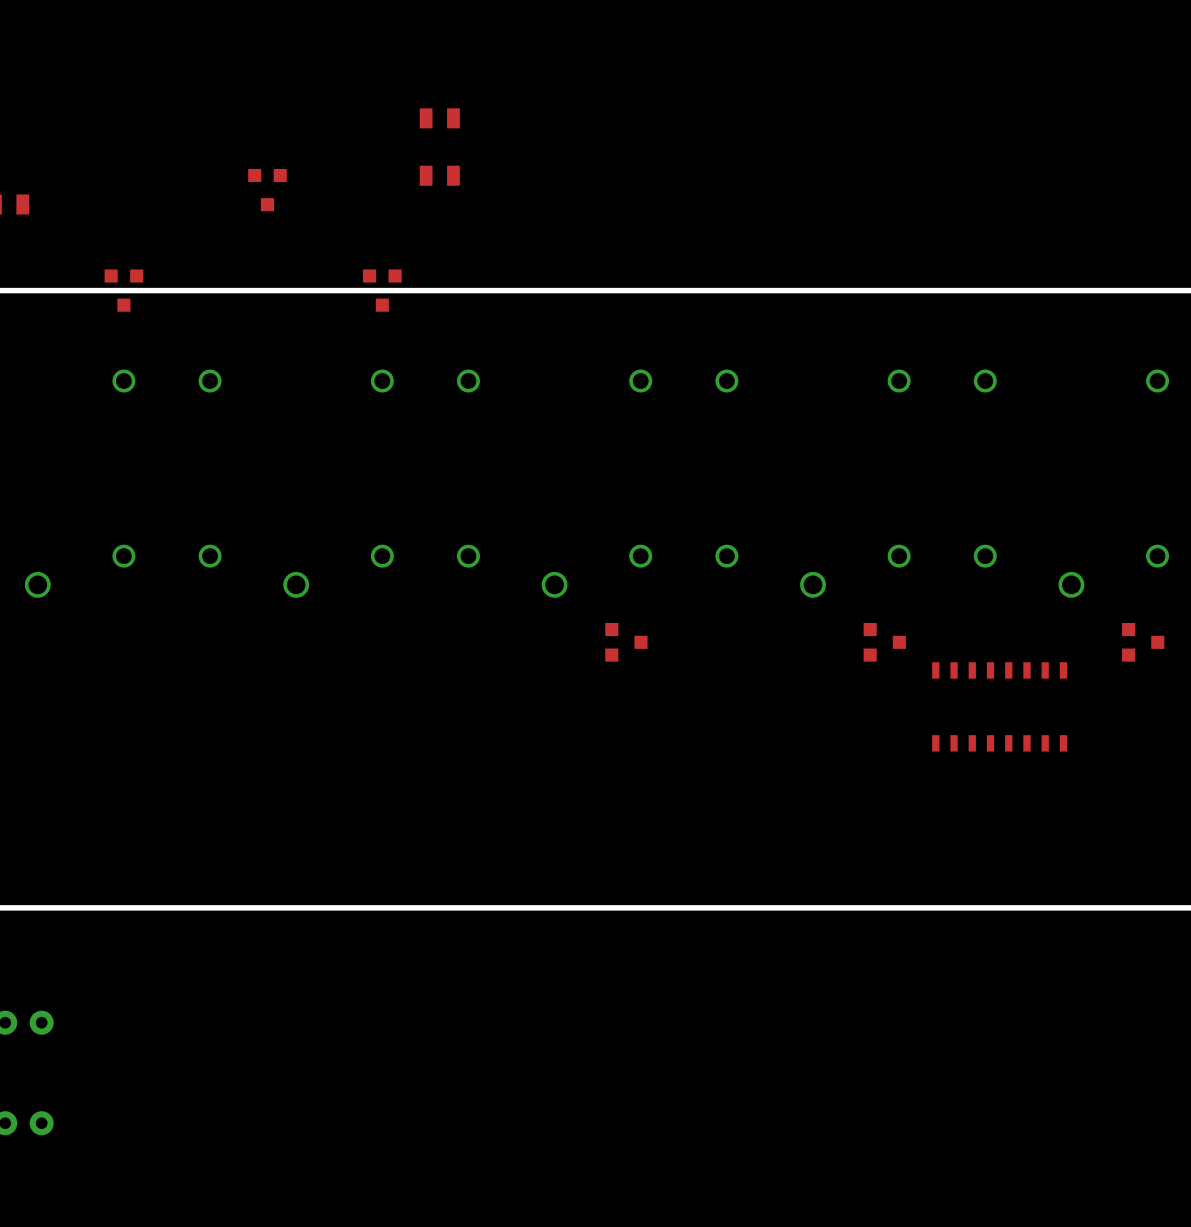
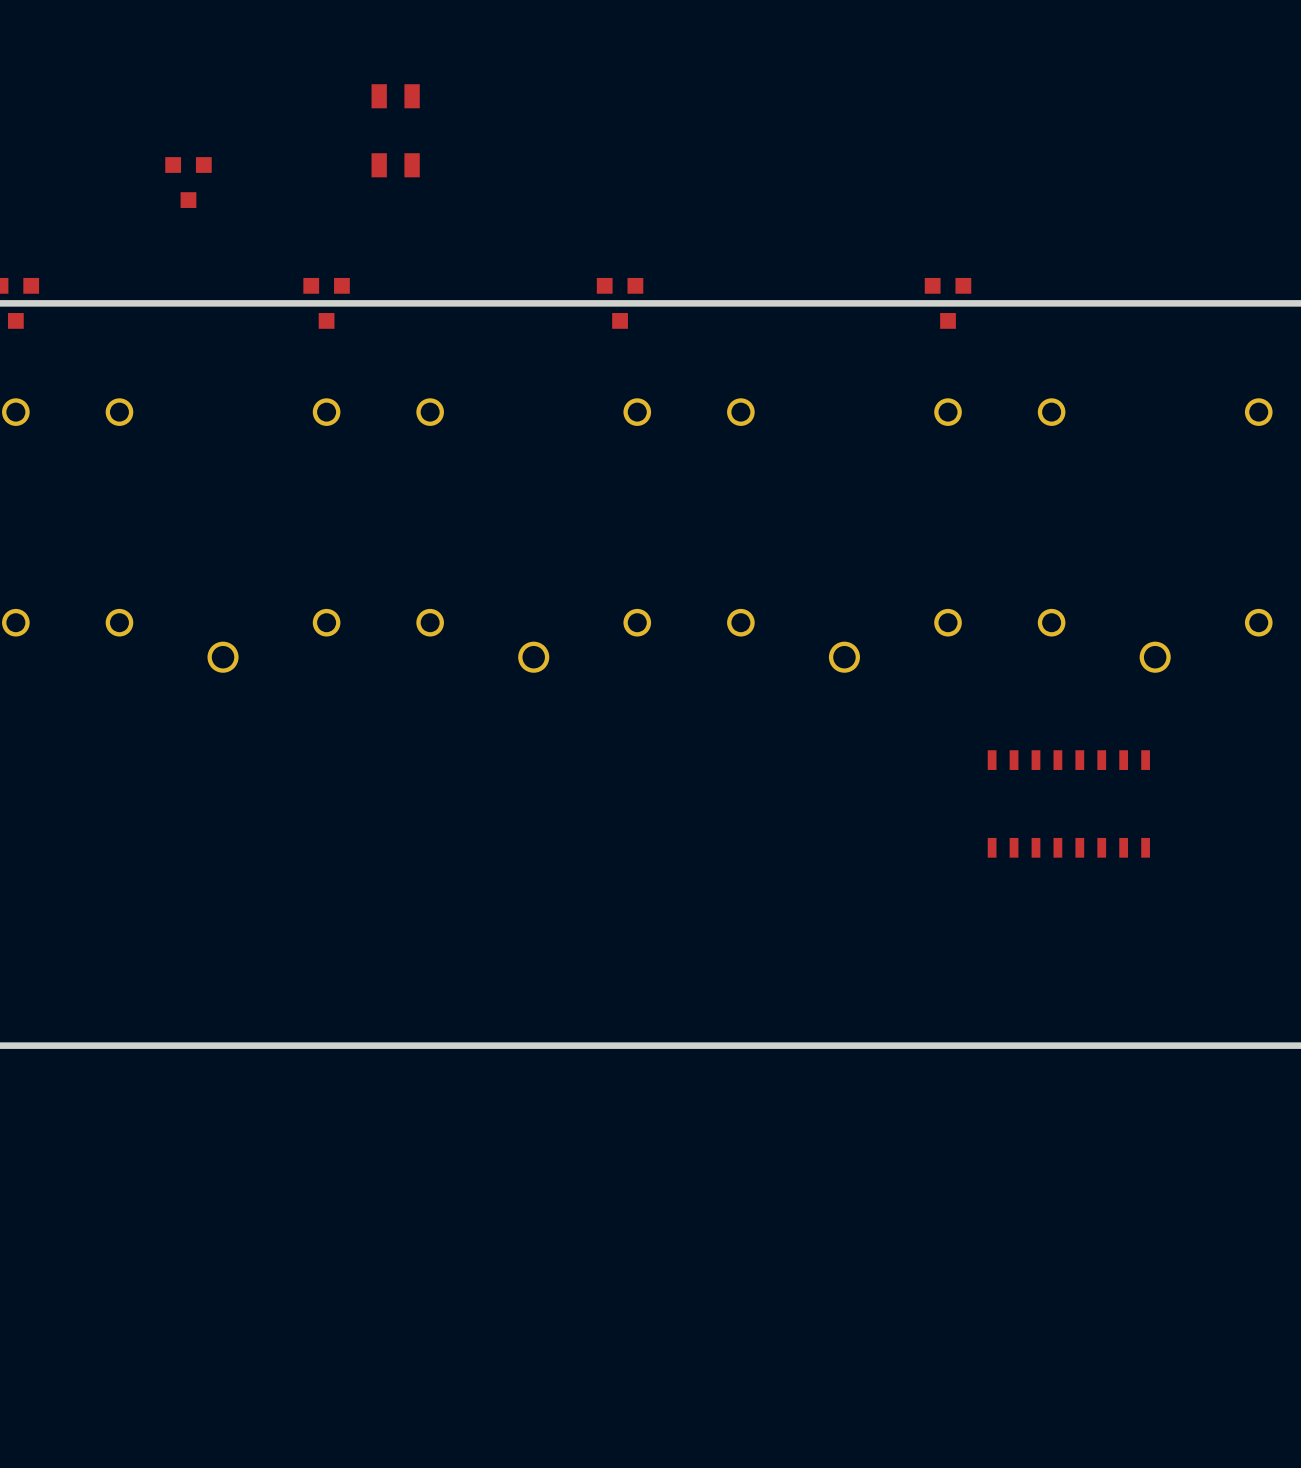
part: none -> (620, 303)
part: none -> (948, 303)
part: (626, 642) -> none
part: (884, 642) -> none
part: (1143, 642) -> none

